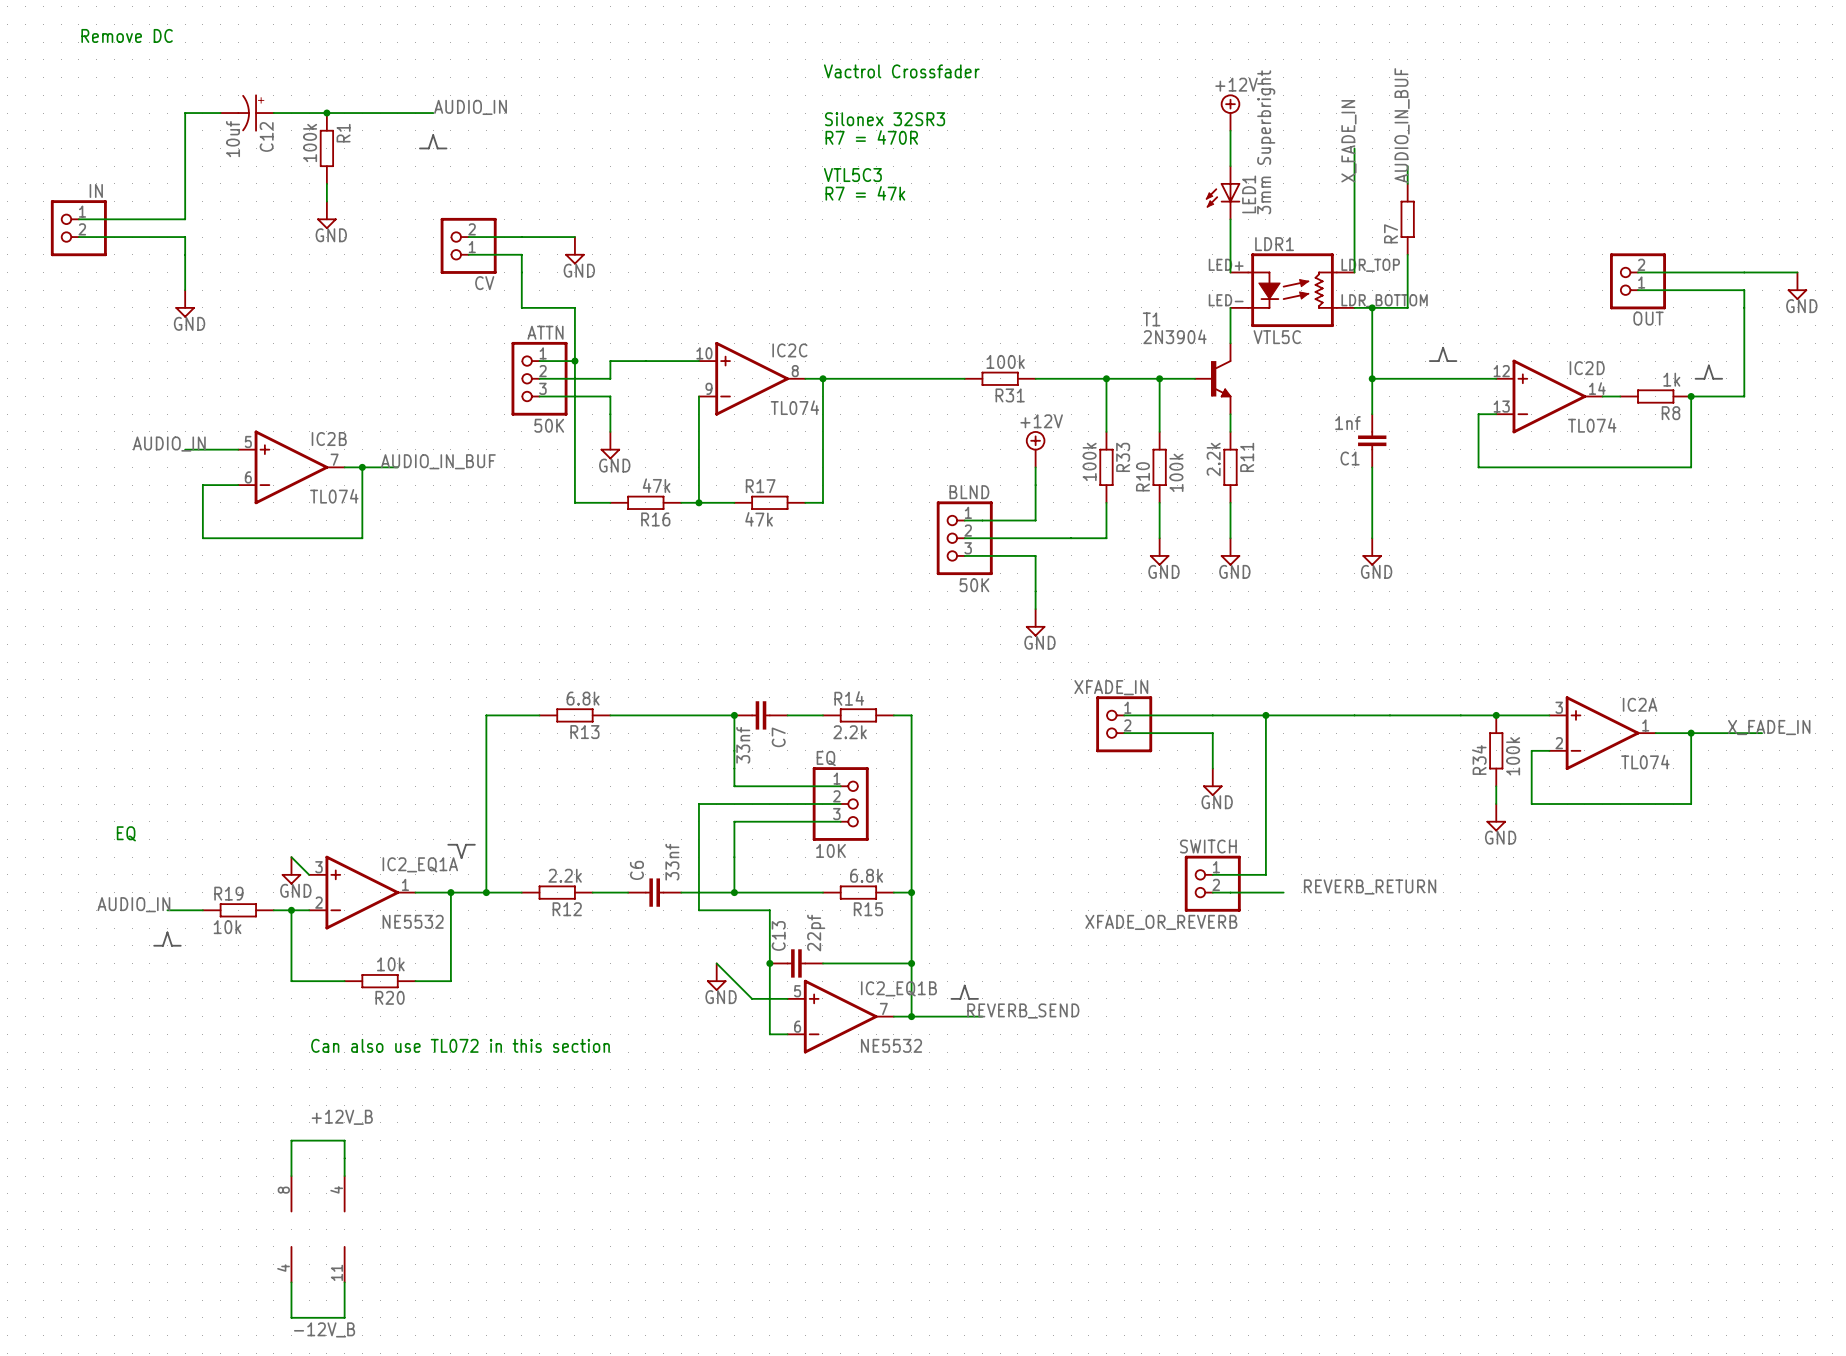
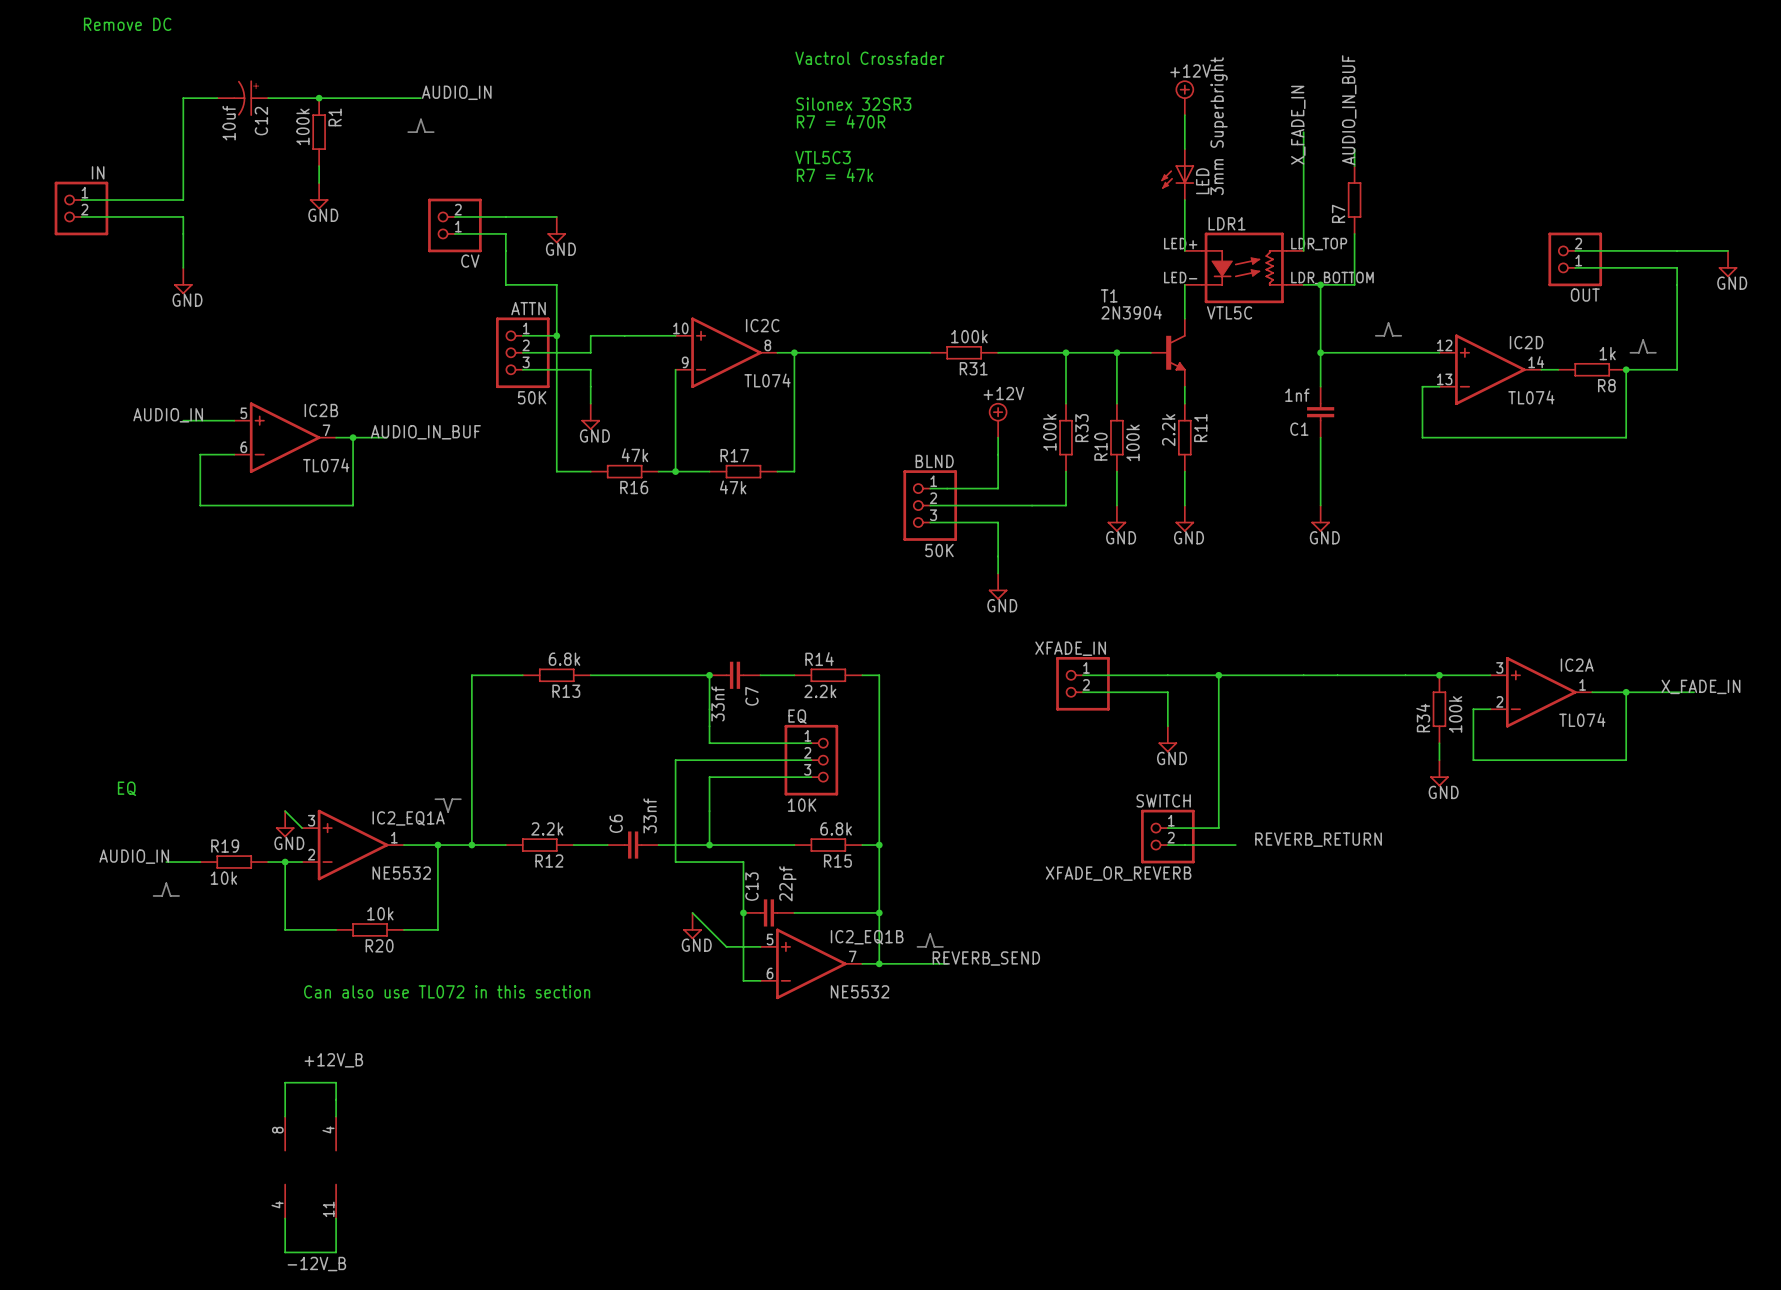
LED1 name: LED1 (1249, 194) -> LED (1202, 181)

